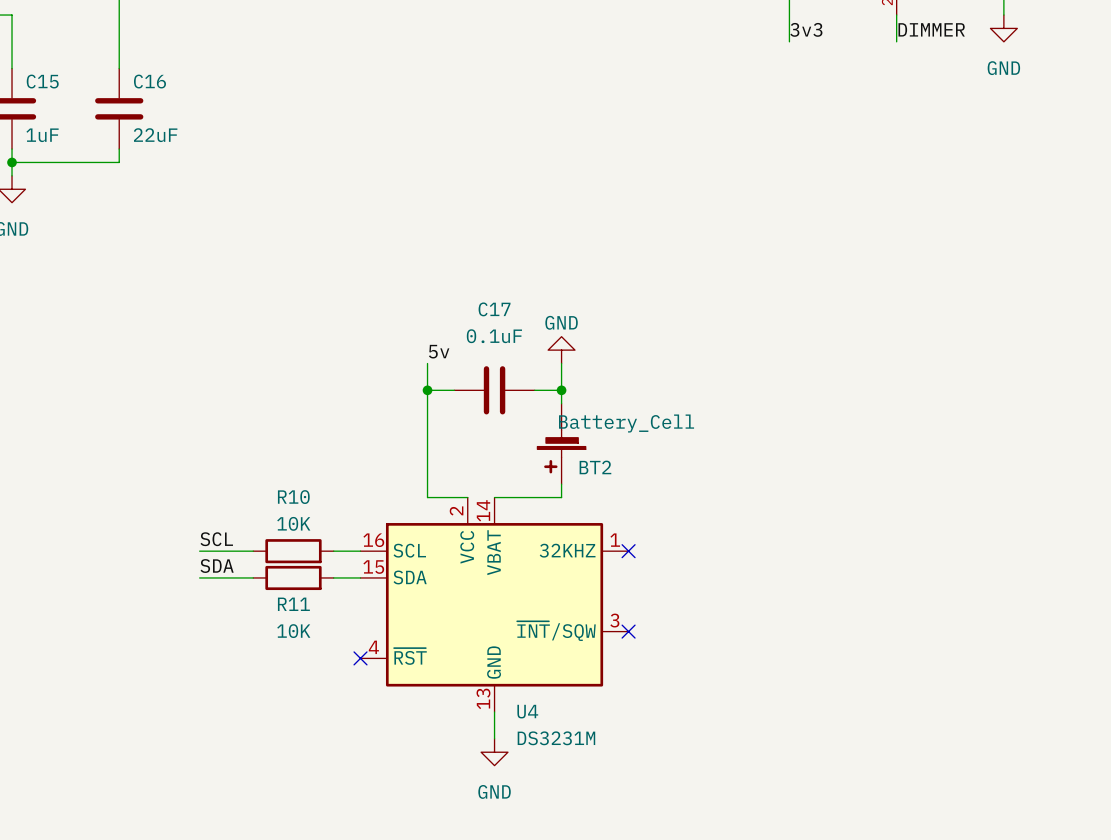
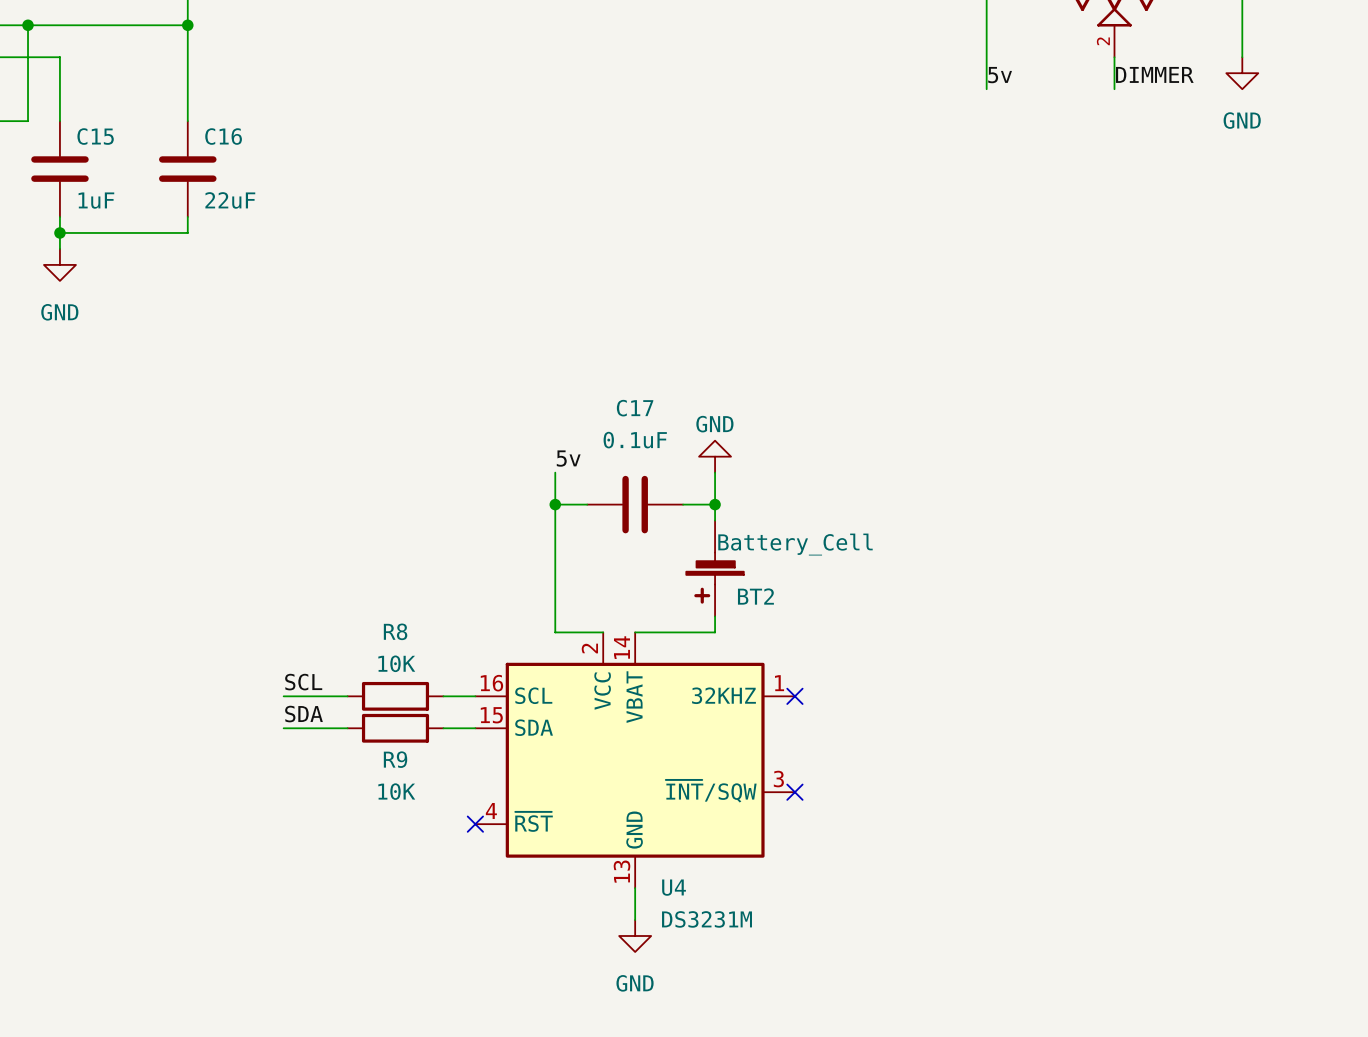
label: 3v3 (806, 29) -> 5v (1000, 75)
R10 name: R10 (293, 497) -> R8 (395, 631)
R11 name: R11 (293, 604) -> R9 (395, 759)

